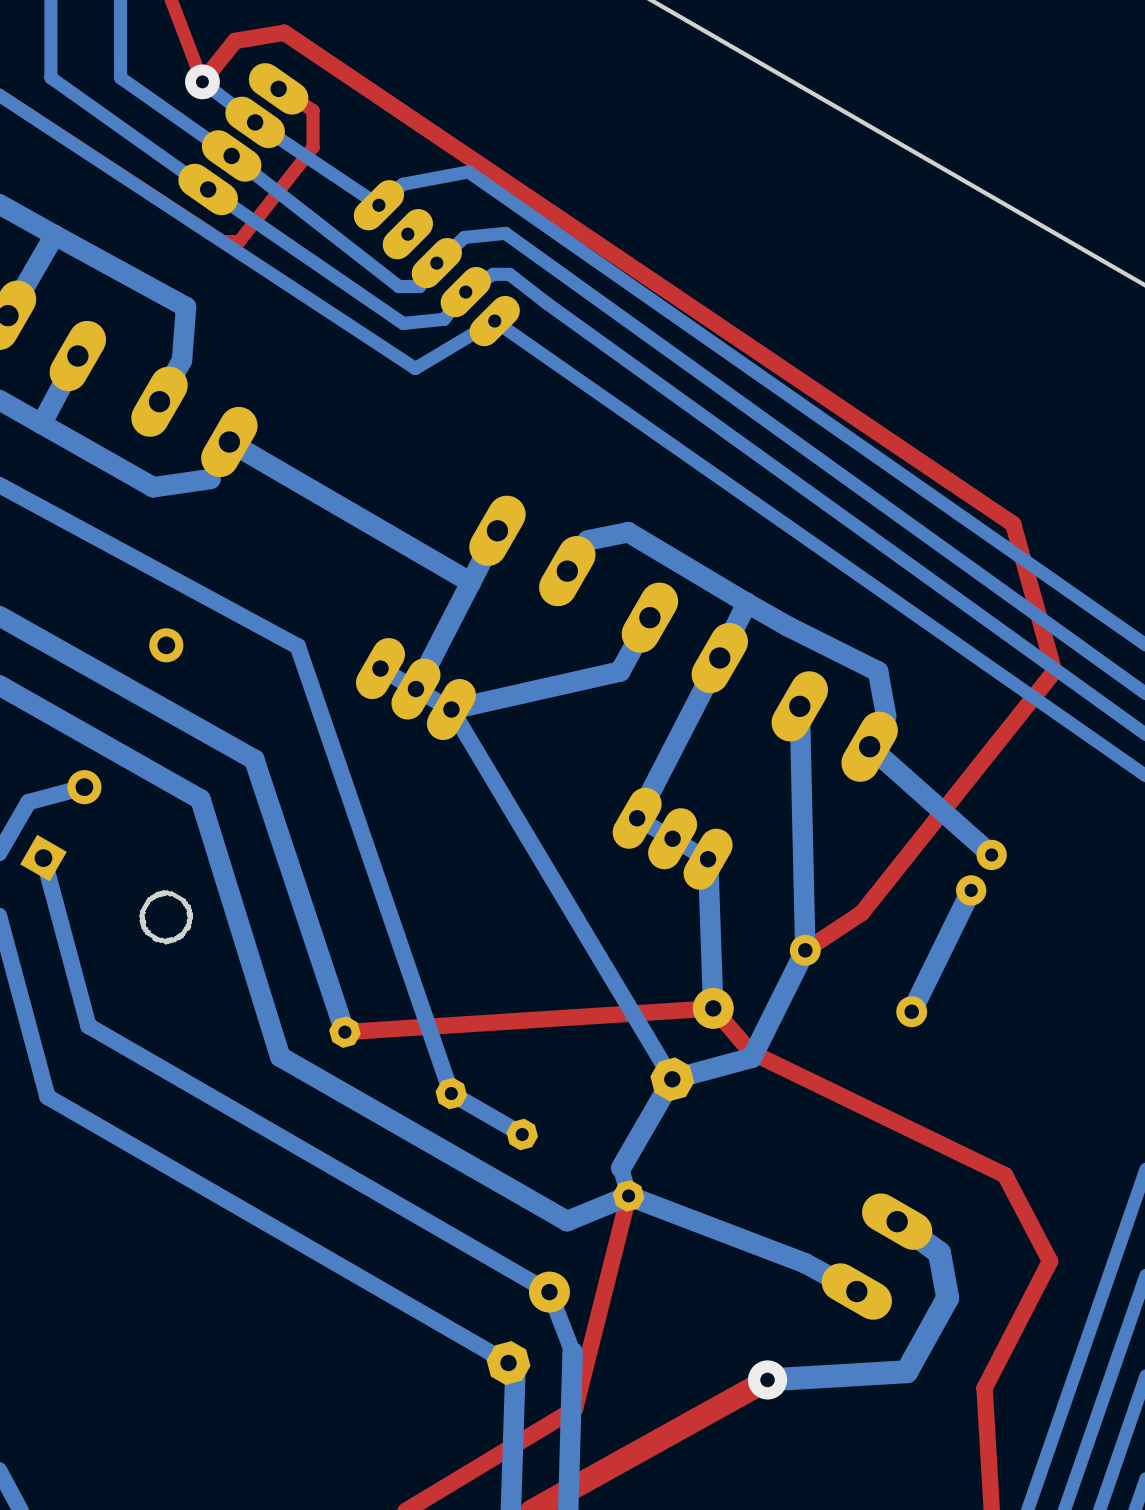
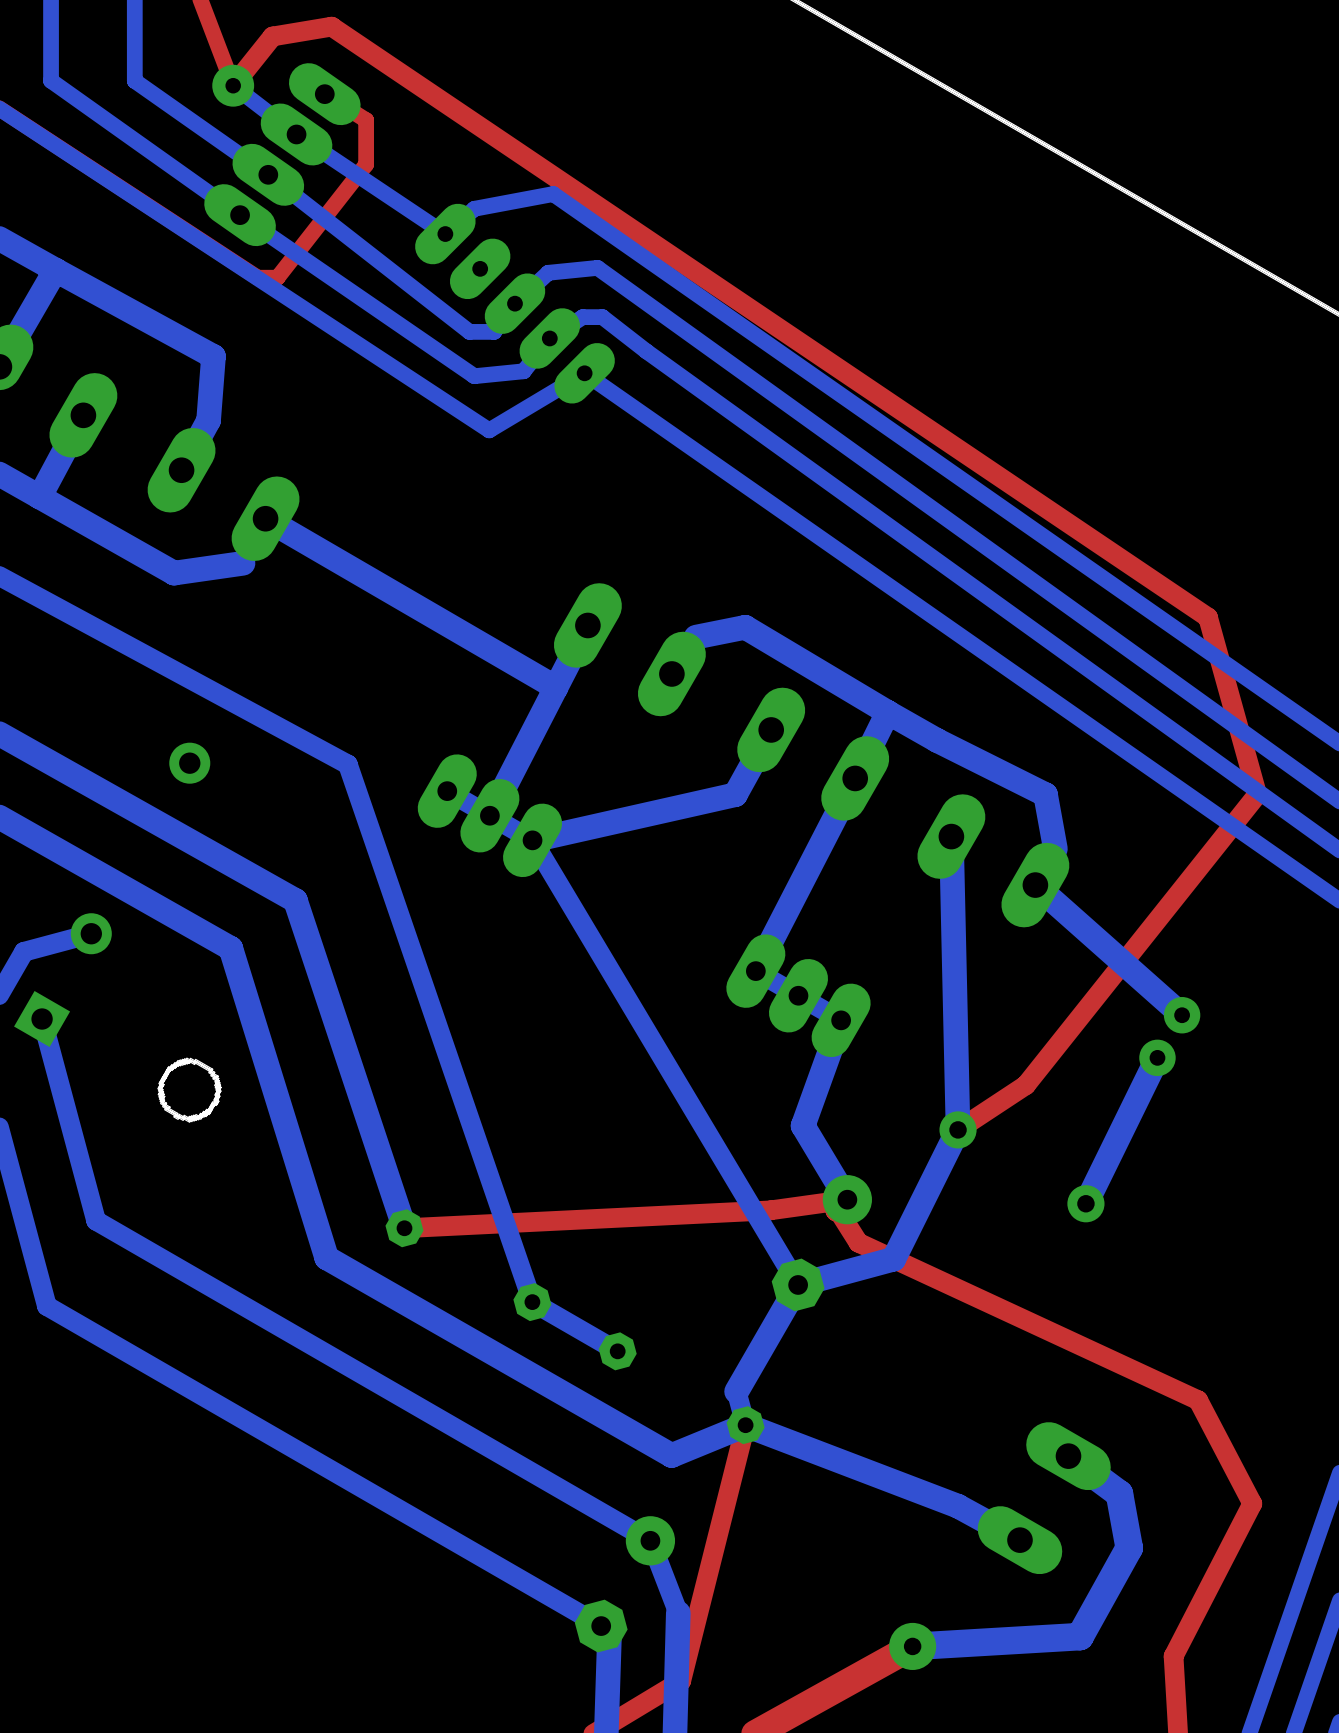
bottom track: (708, 859) (713, 1008) -> (841, 1020) (803, 1125) (847, 1199)
top track: none -> (837, 1209) (858, 1242) (1198, 1400)
top track: (344, 1032) (713, 1008) (751, 1052) (1005, 1175) -> (404, 1228) (770, 1210) (842, 1200)

